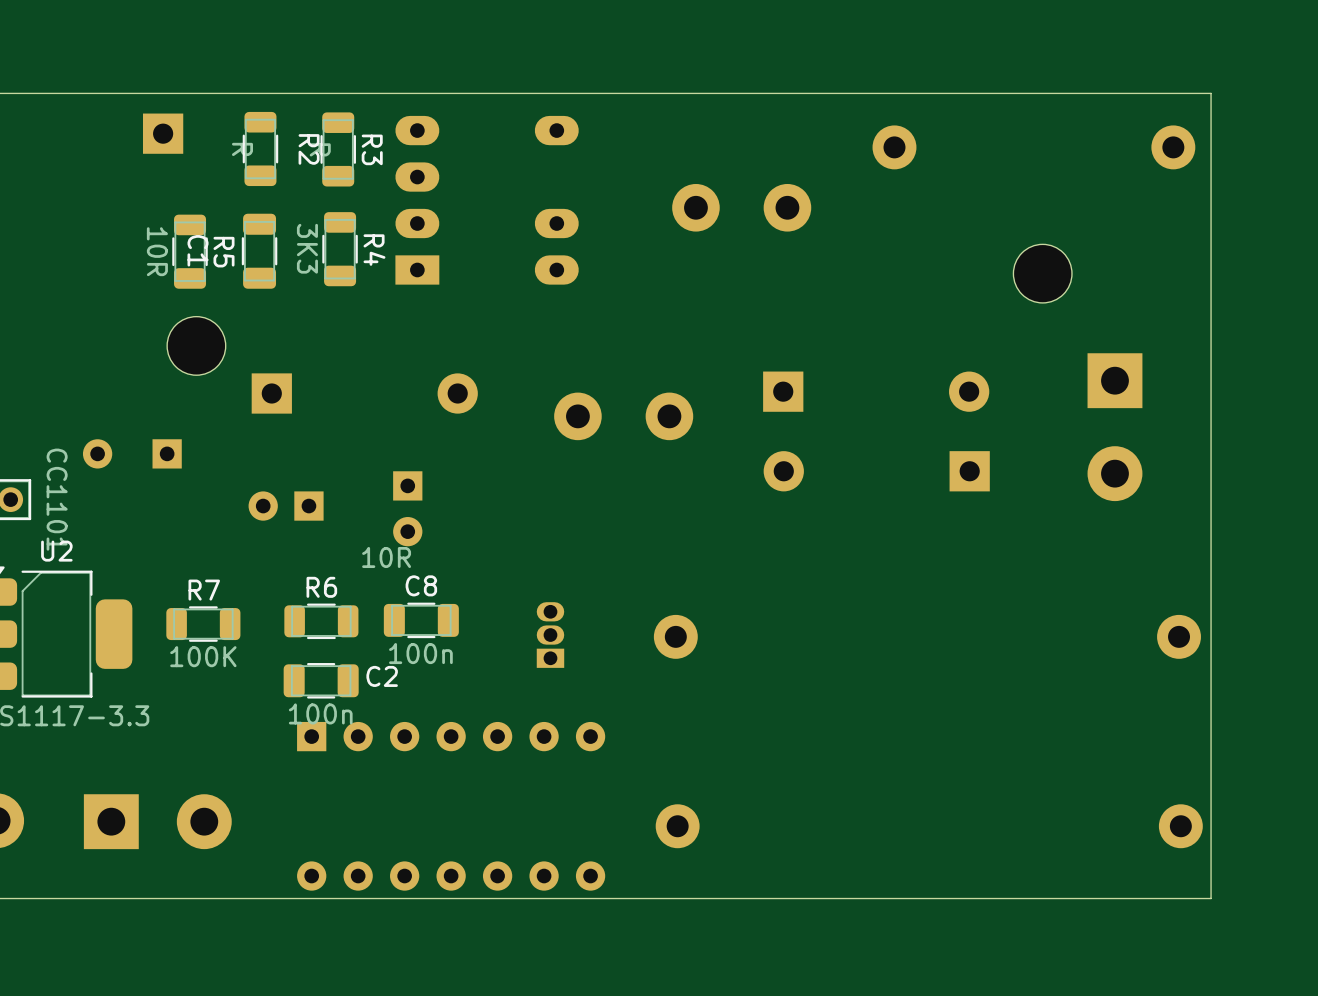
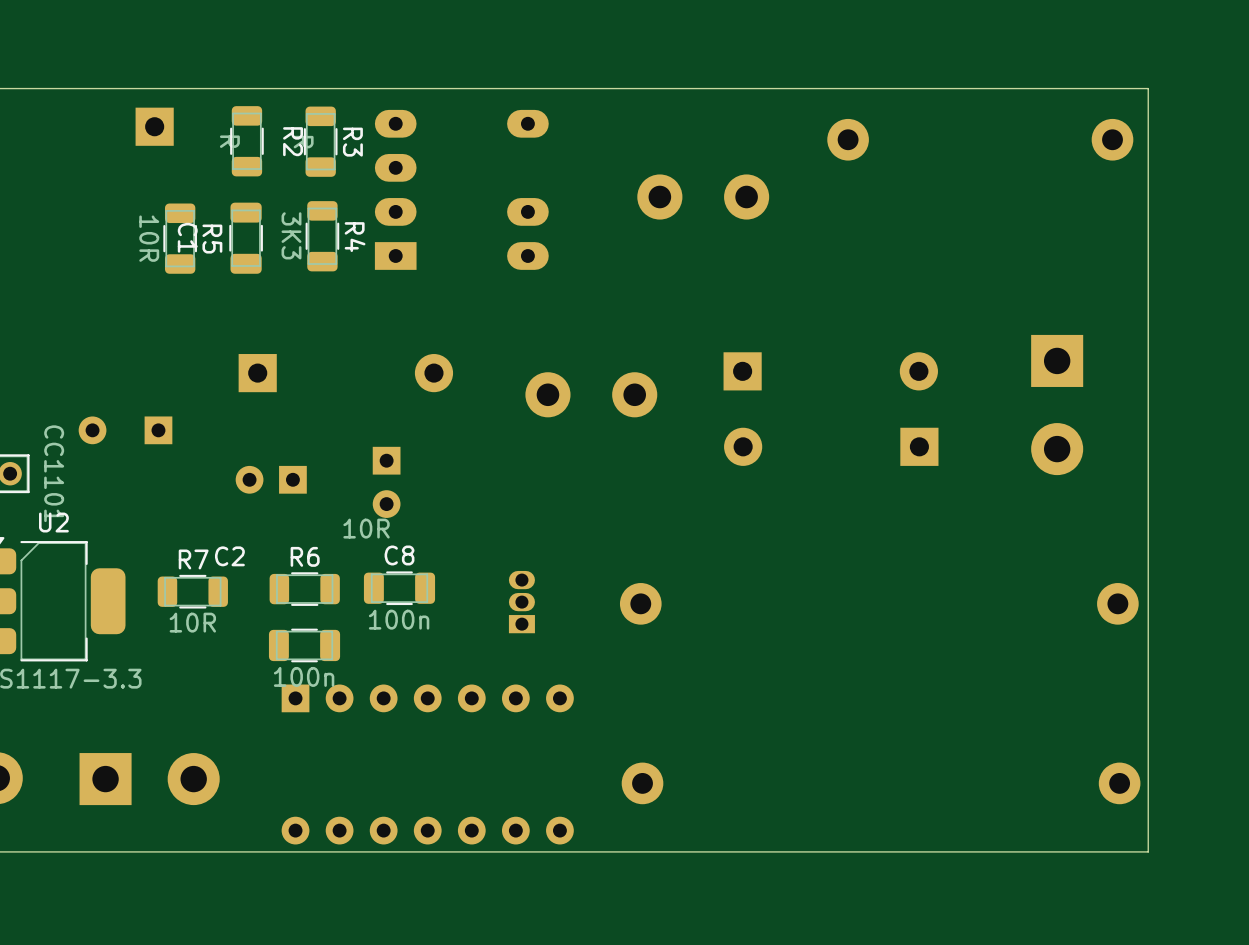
part: (1042, 273) -> none
part: (196, 345) -> none
R7 value: 100K (203, 656) -> 10R (192, 622)
C2 name position: C2 (382, 676) -> C2 (229, 556)

